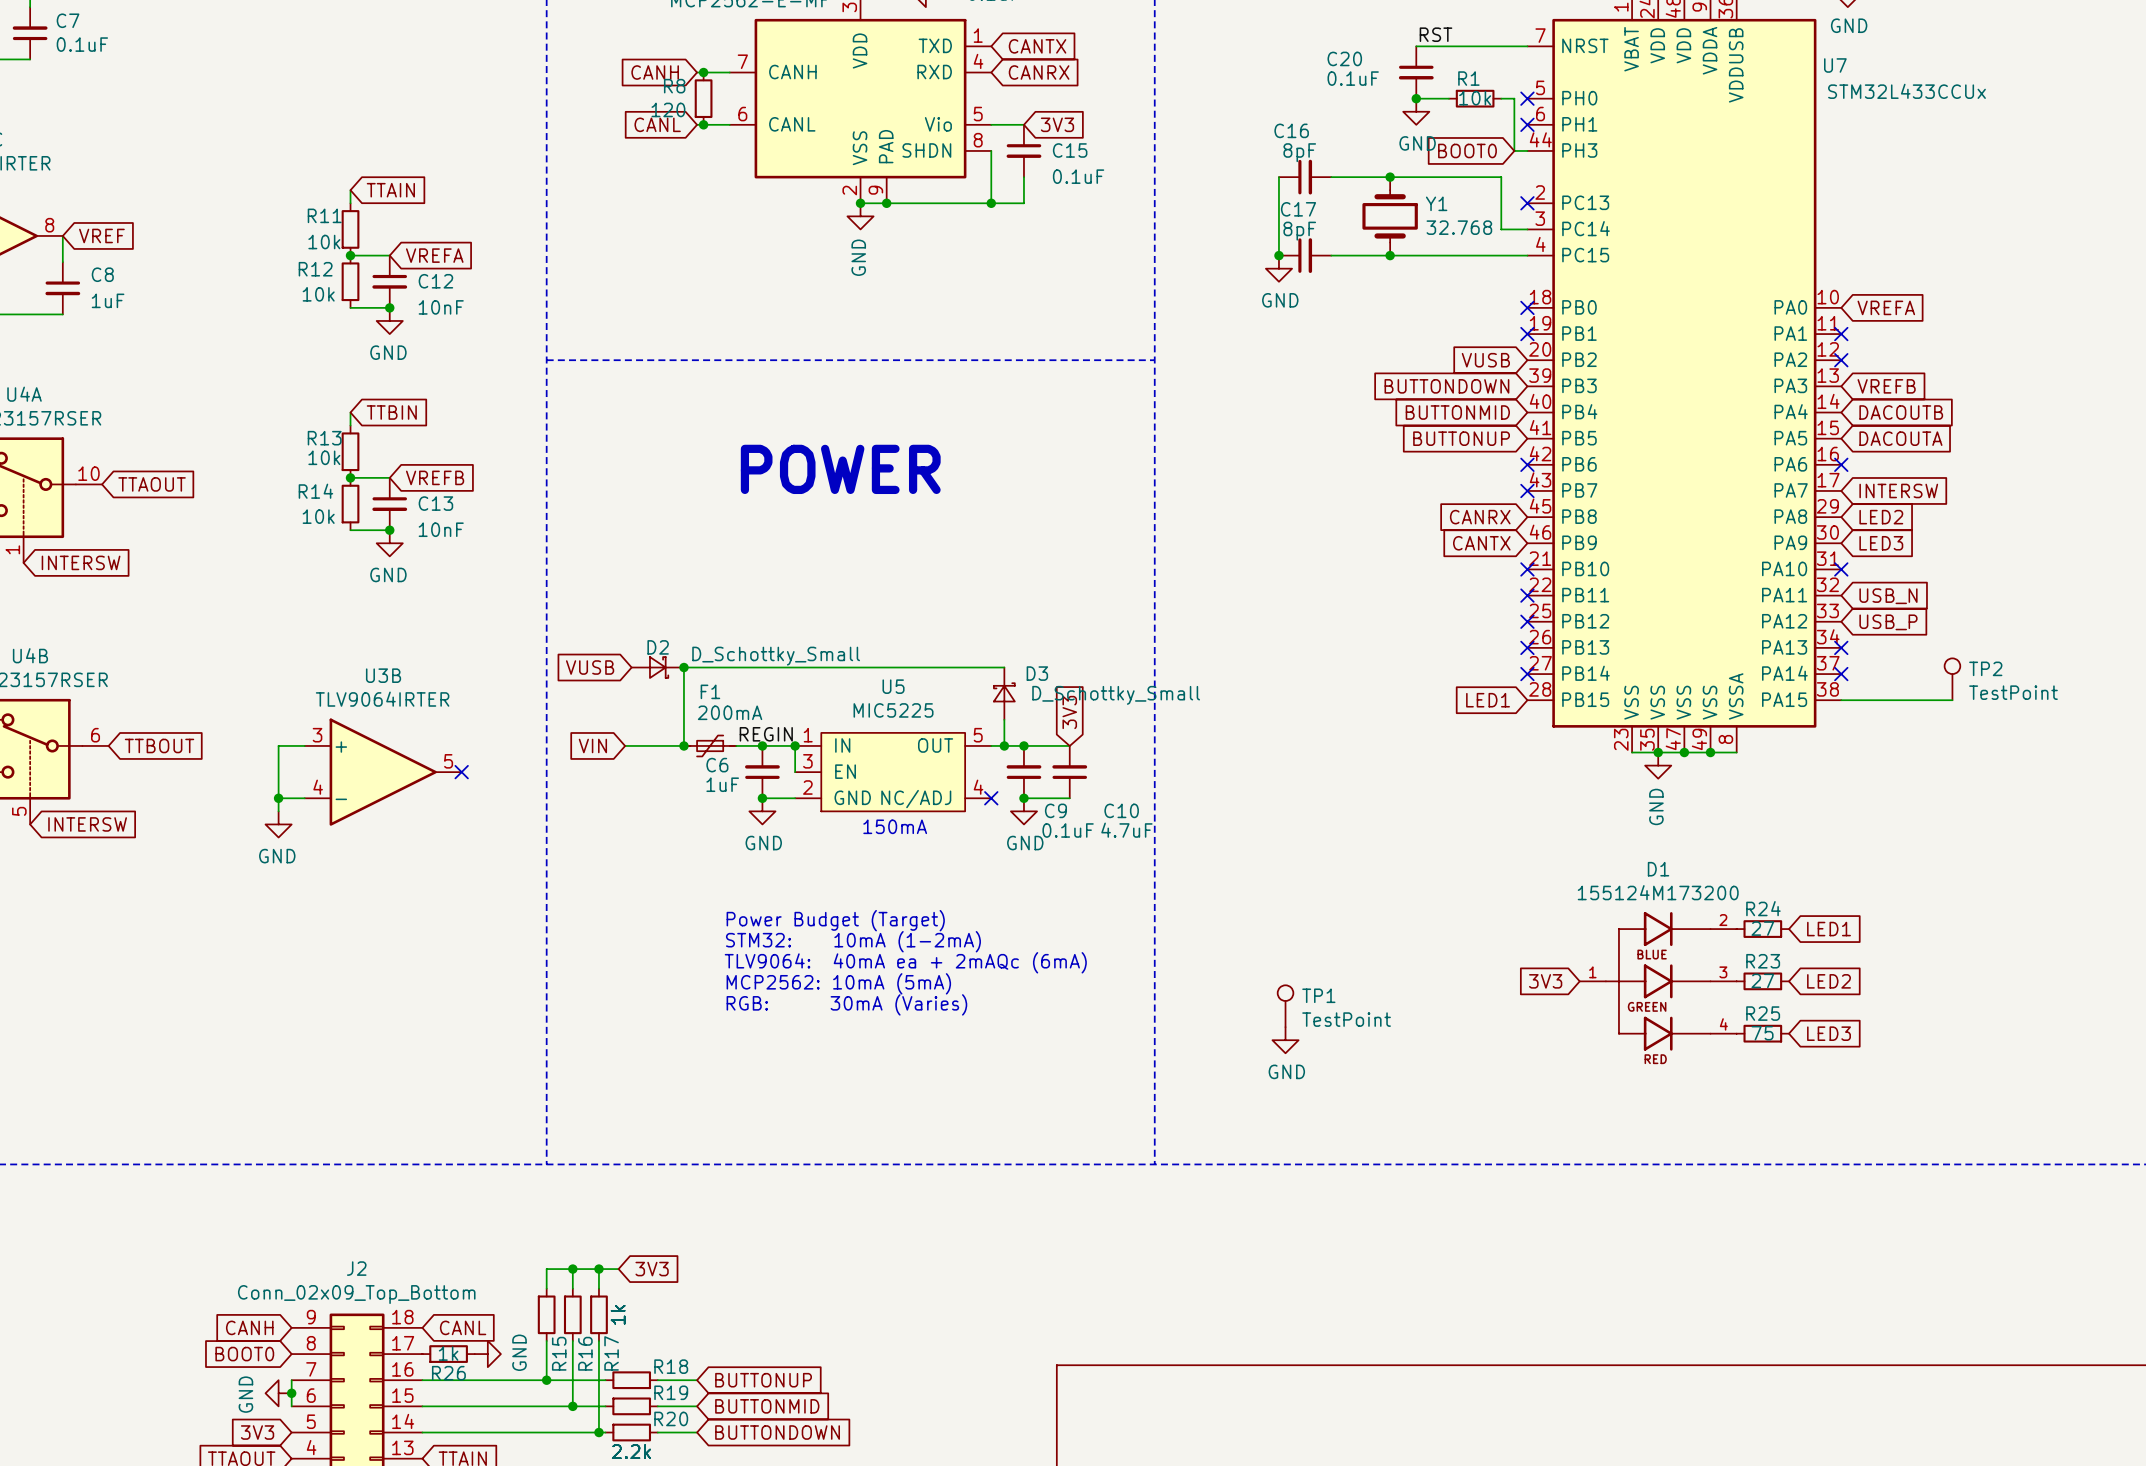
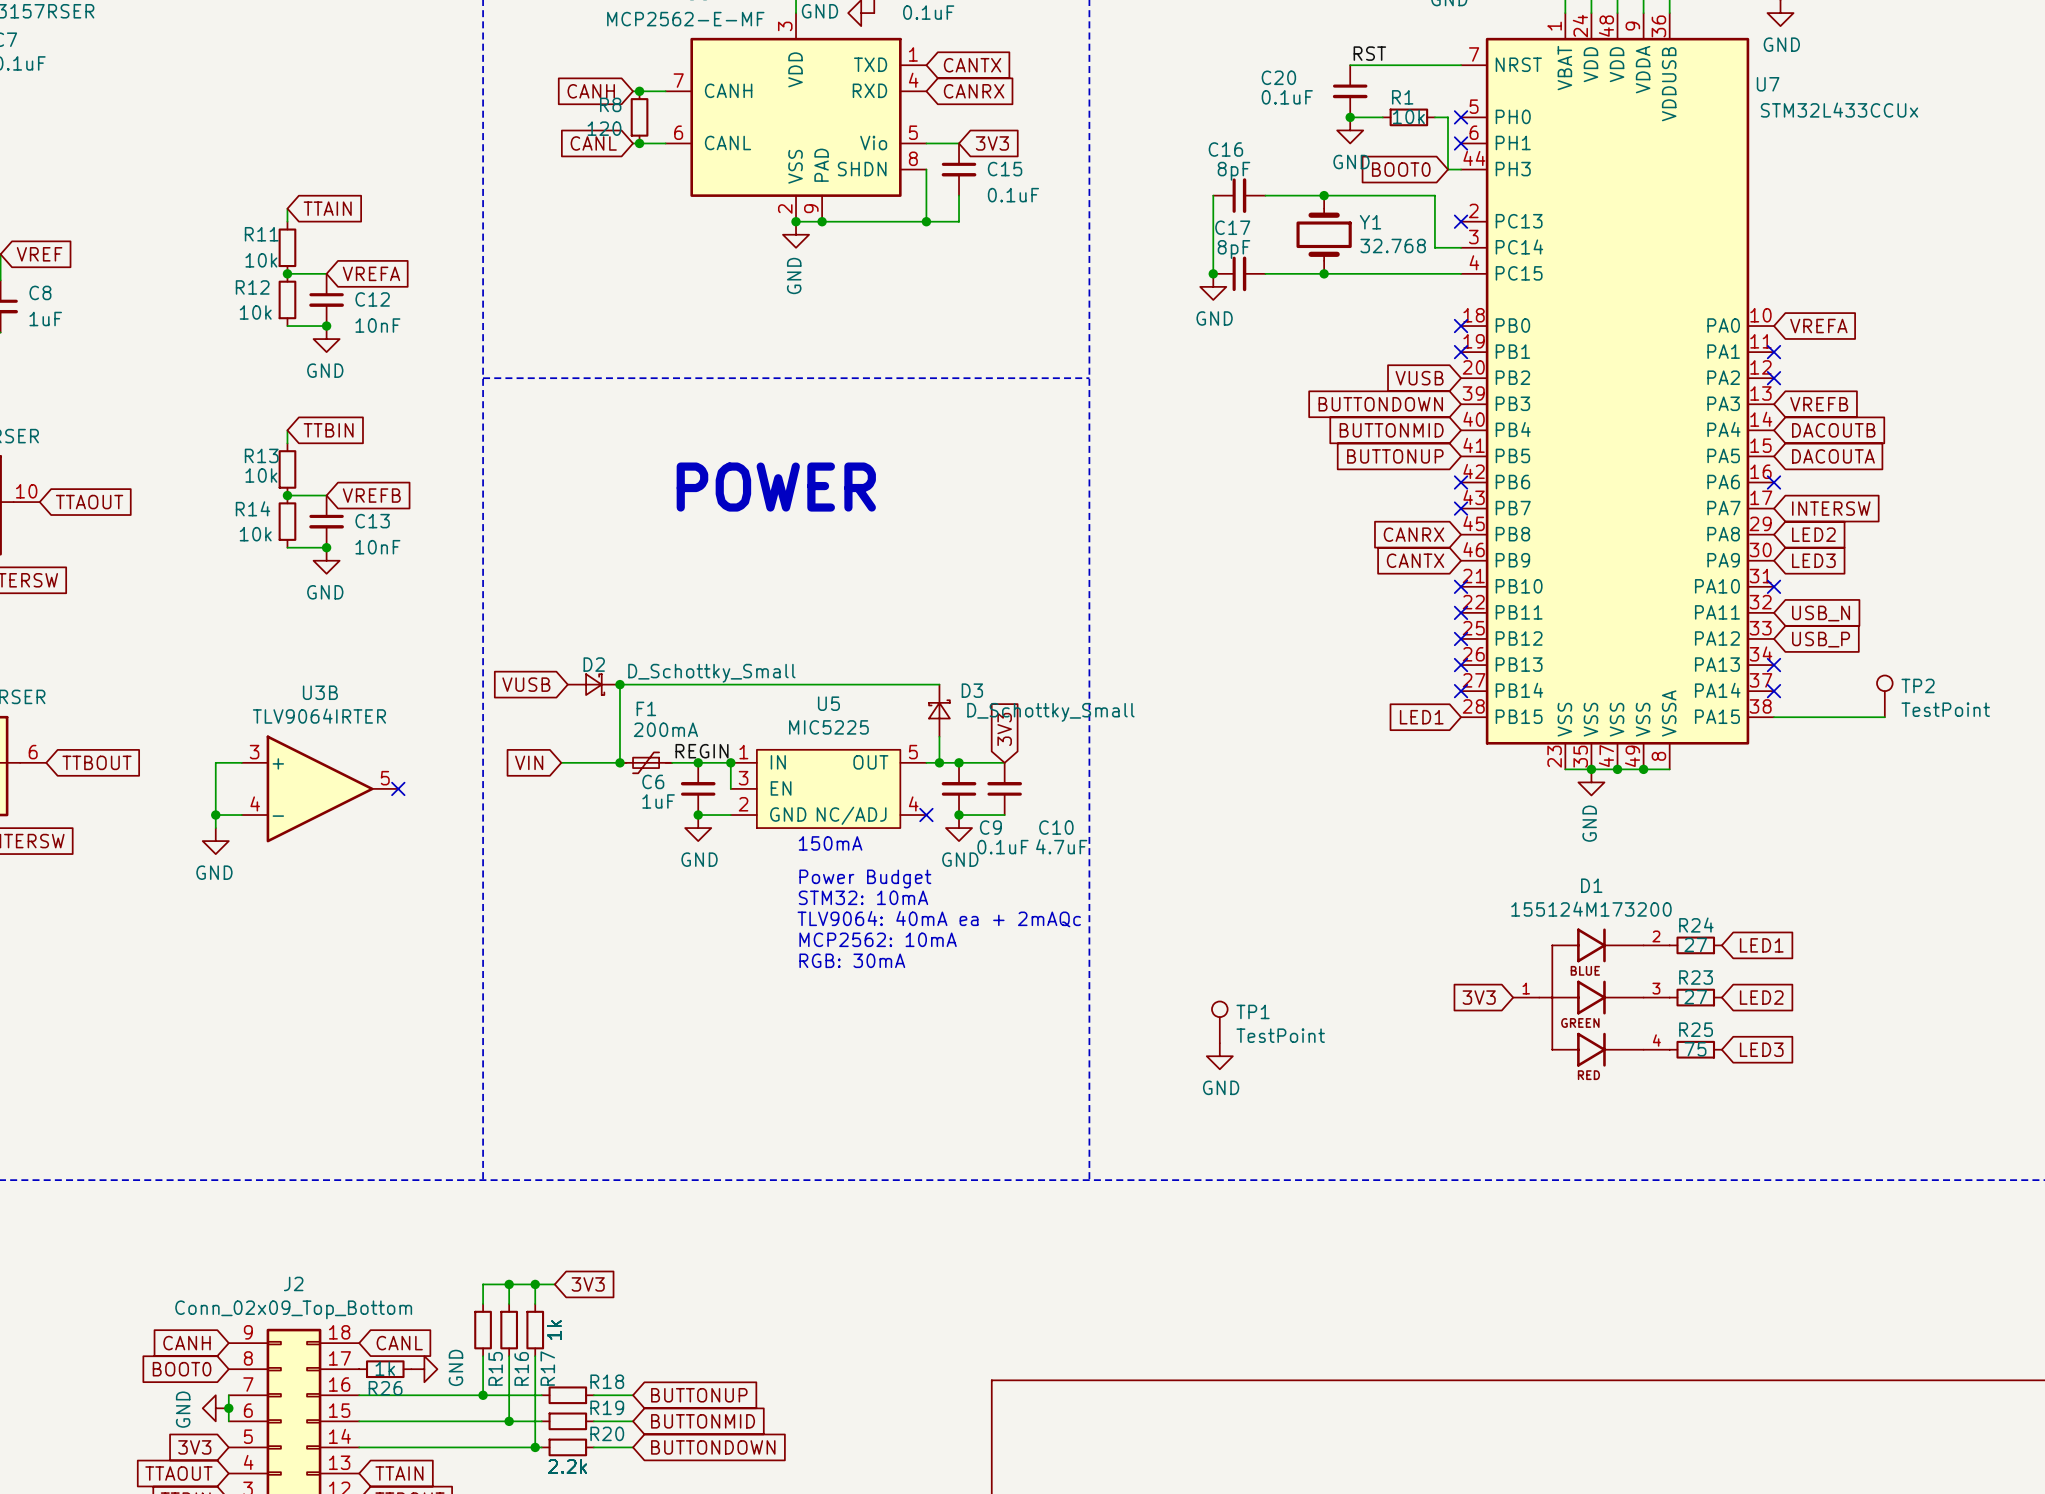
text: none -> Power Budget (865, 879)
text: none -> STM32: 10mA (863, 897)
text: none -> TLV9064: 40mA ea + 2mAQc (939, 919)
text: Power Budget (Target) (835, 920) -> none
text: none -> MCP2562: 10mA (878, 939)
text: STM32: 10mA (1-2mA) (853, 941) -> none
text: none -> RGB: 30mA (852, 960)
text: TLV9064: 40mA ea + 2mAQc (6mA) (905, 962) -> none
text: MCP2562: 10mA (5mA) (838, 983) -> none
text: RGB: 30mA (Varies) (846, 1004) -> none

